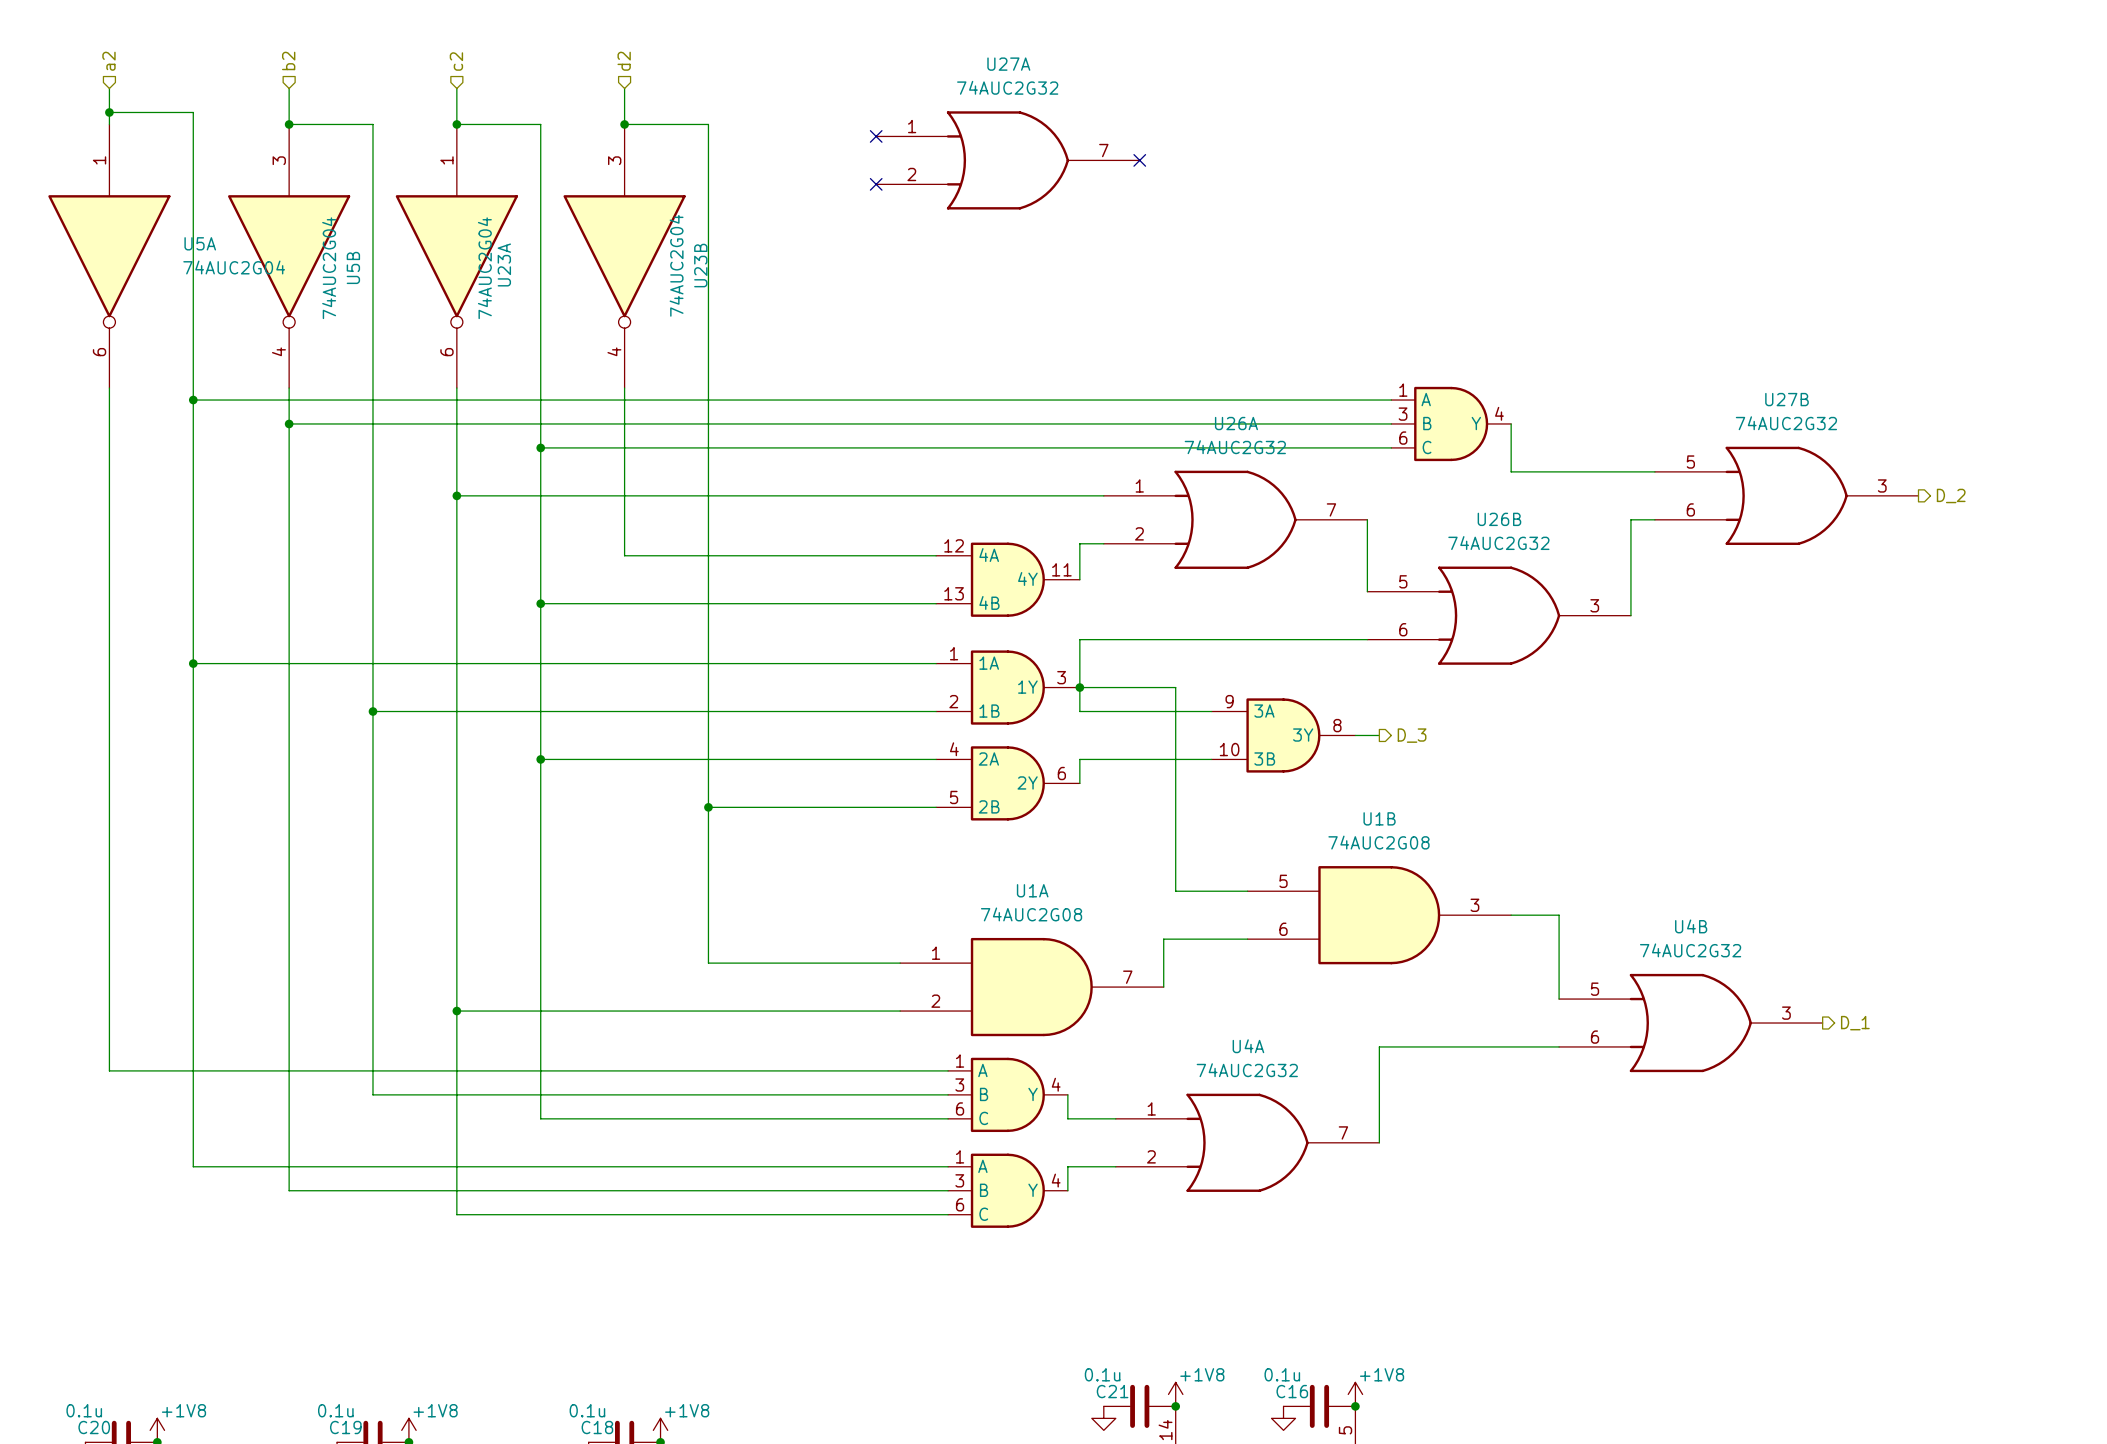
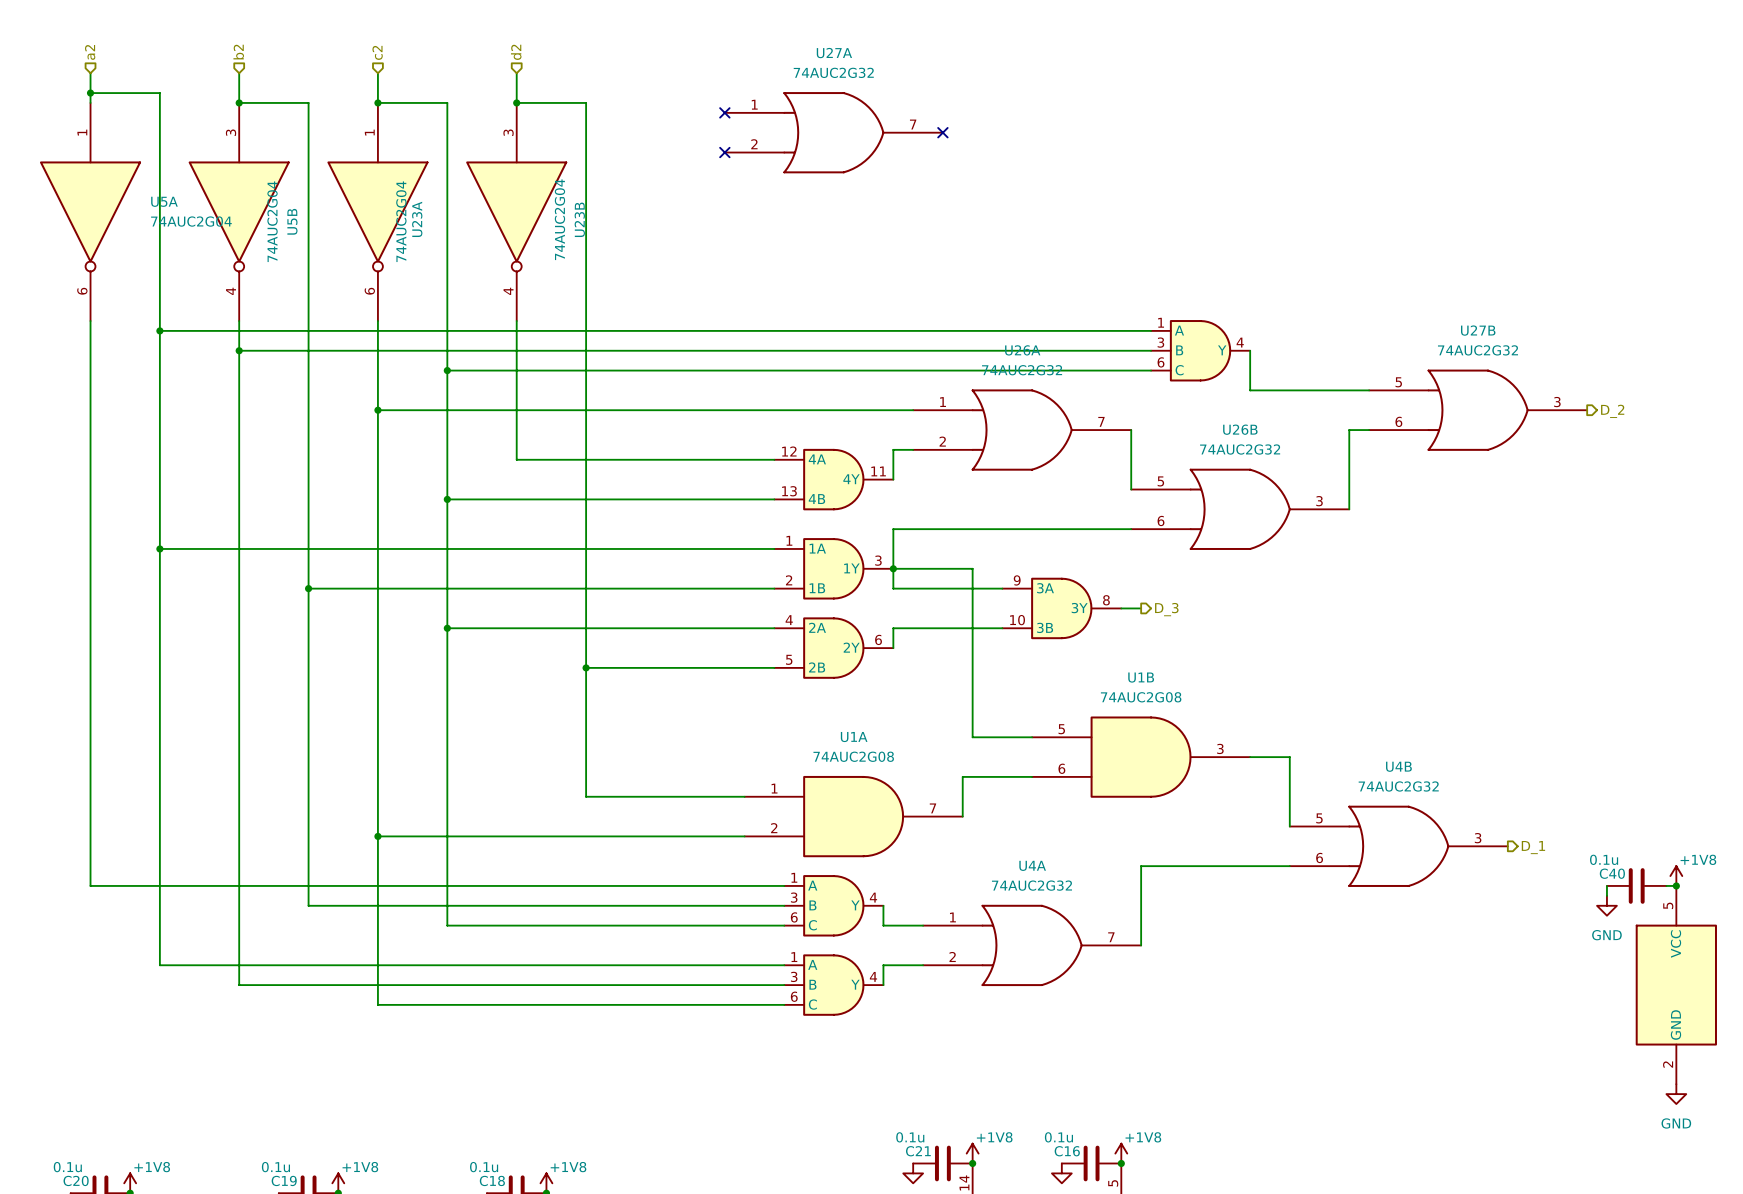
power symbol: none -> +1V8 (1676, 876)
wire: none -> (1606, 885) (1606, 895)
C40: none -> 0.1u (1636, 885)
wire: none -> (1666, 885) (1676, 885)
junction: none -> (1676, 885)
power symbol: none -> GND (1606, 905)
part: none -> (1676, 985)
power symbol: none -> GND (1676, 1094)

